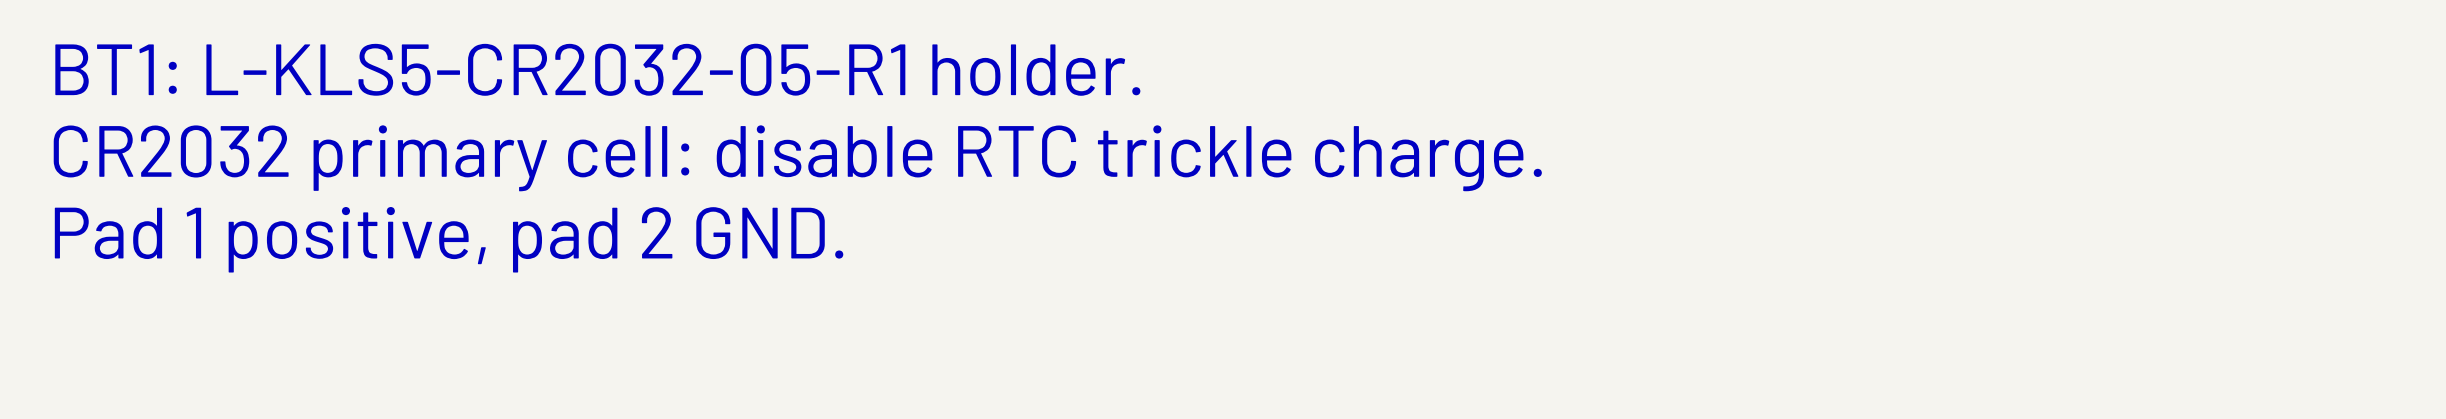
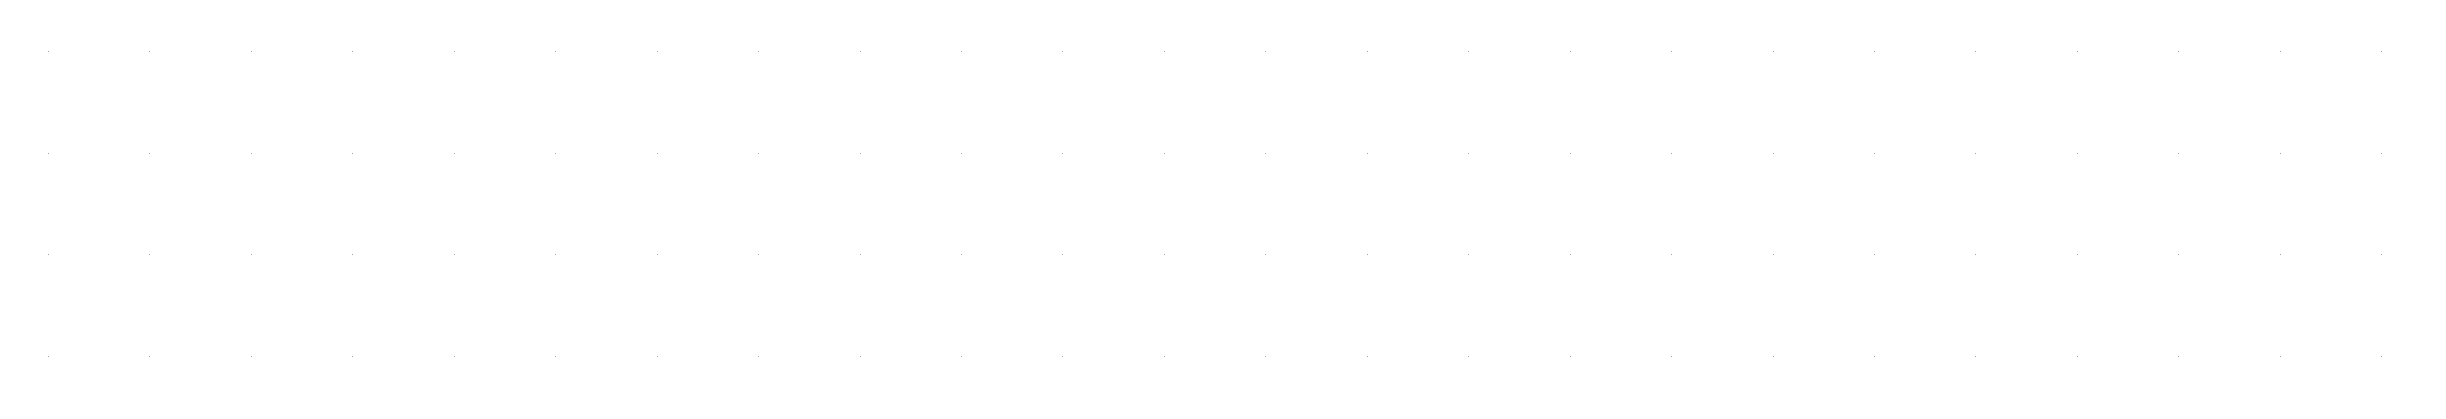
text: BT1: L-KLS5-CR2032-05-R1 holder. (597, 69) -> none
text: CR2032 primary cell: disable RTC trickle charge. (797, 158) -> none
text: Pad 1 positive, pad 2 GND. (449, 239) -> none

